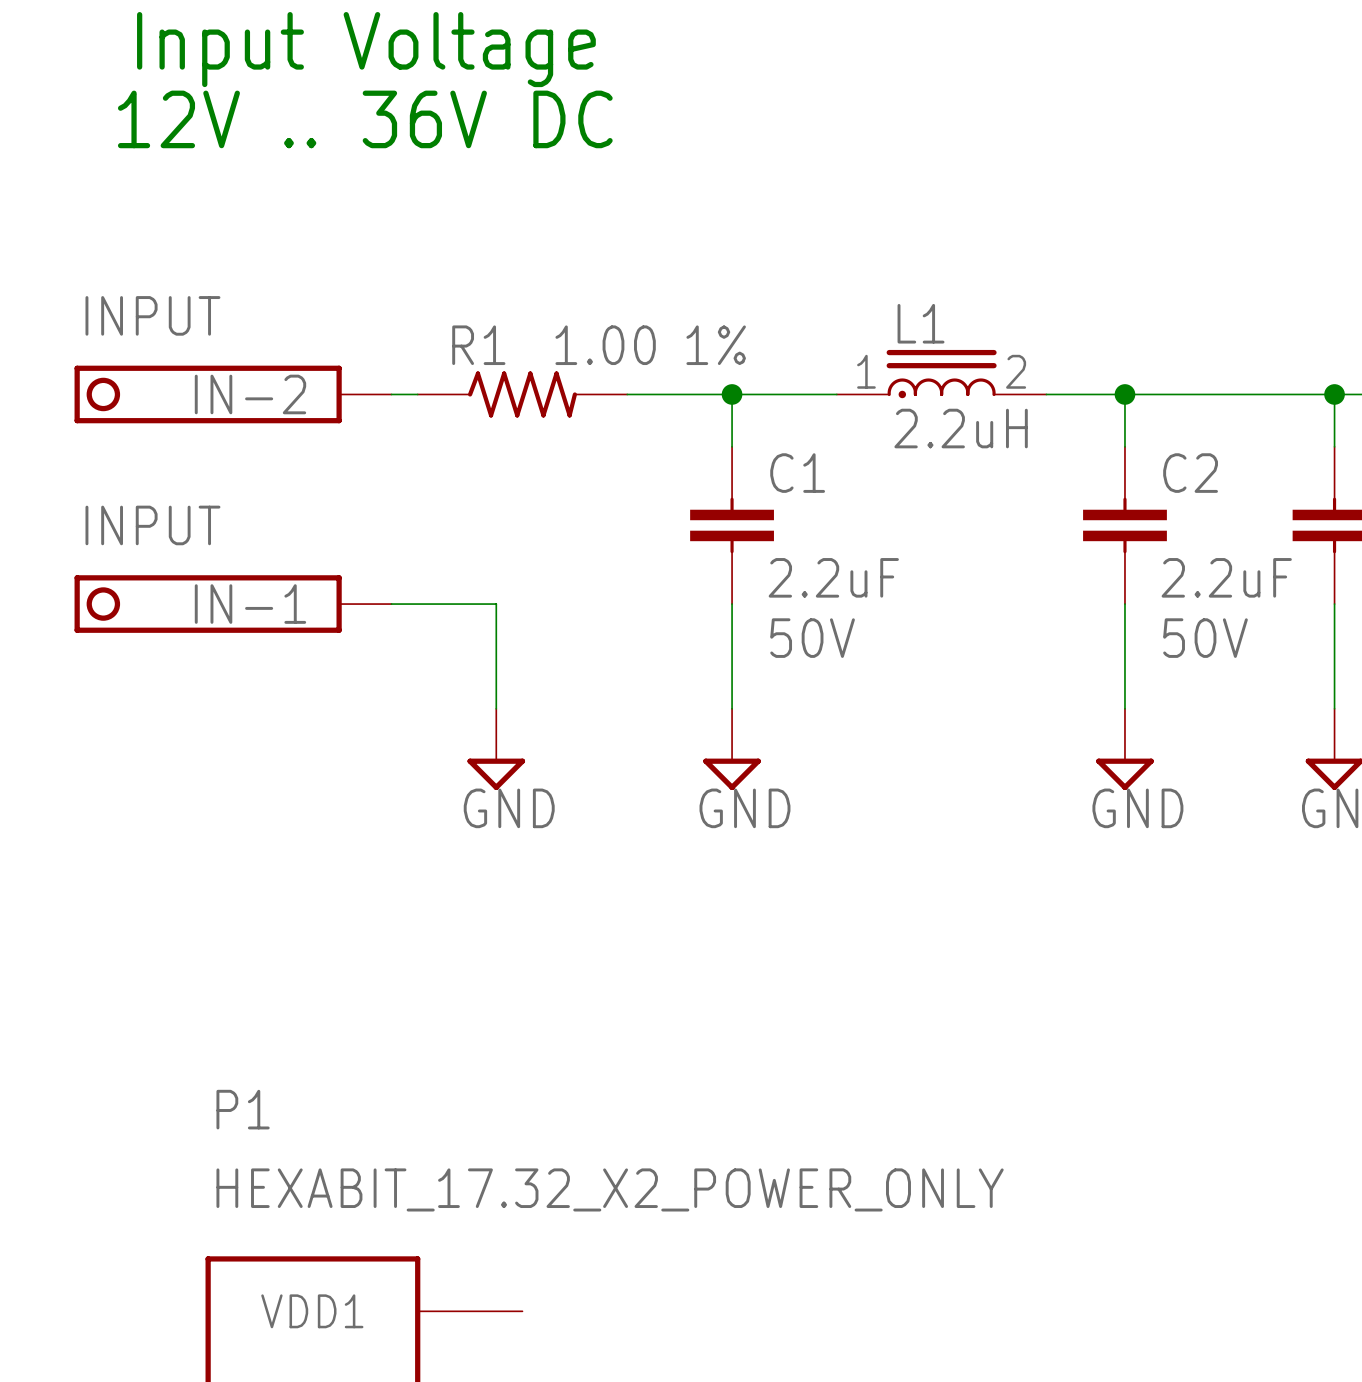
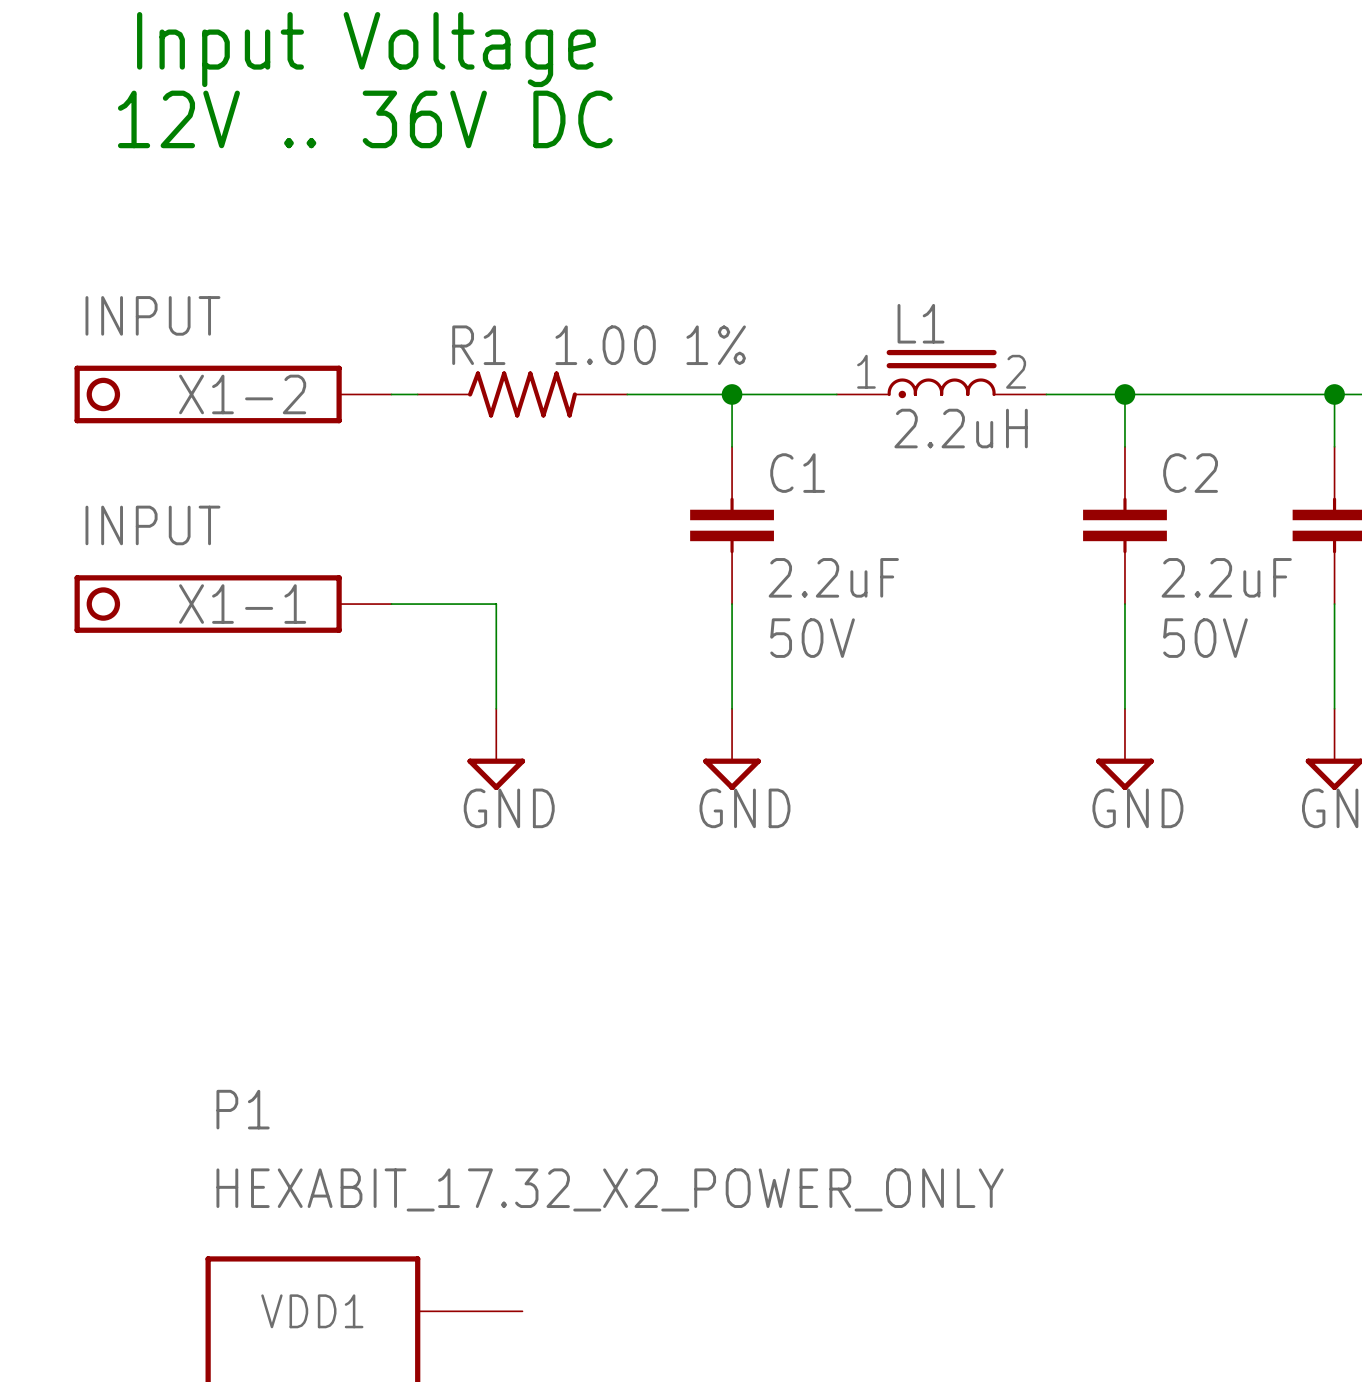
IN-2 name: IN-2 (250, 394) -> X1-2 (242, 394)
IN-1 name: IN-1 (250, 604) -> X1-1 (242, 604)

